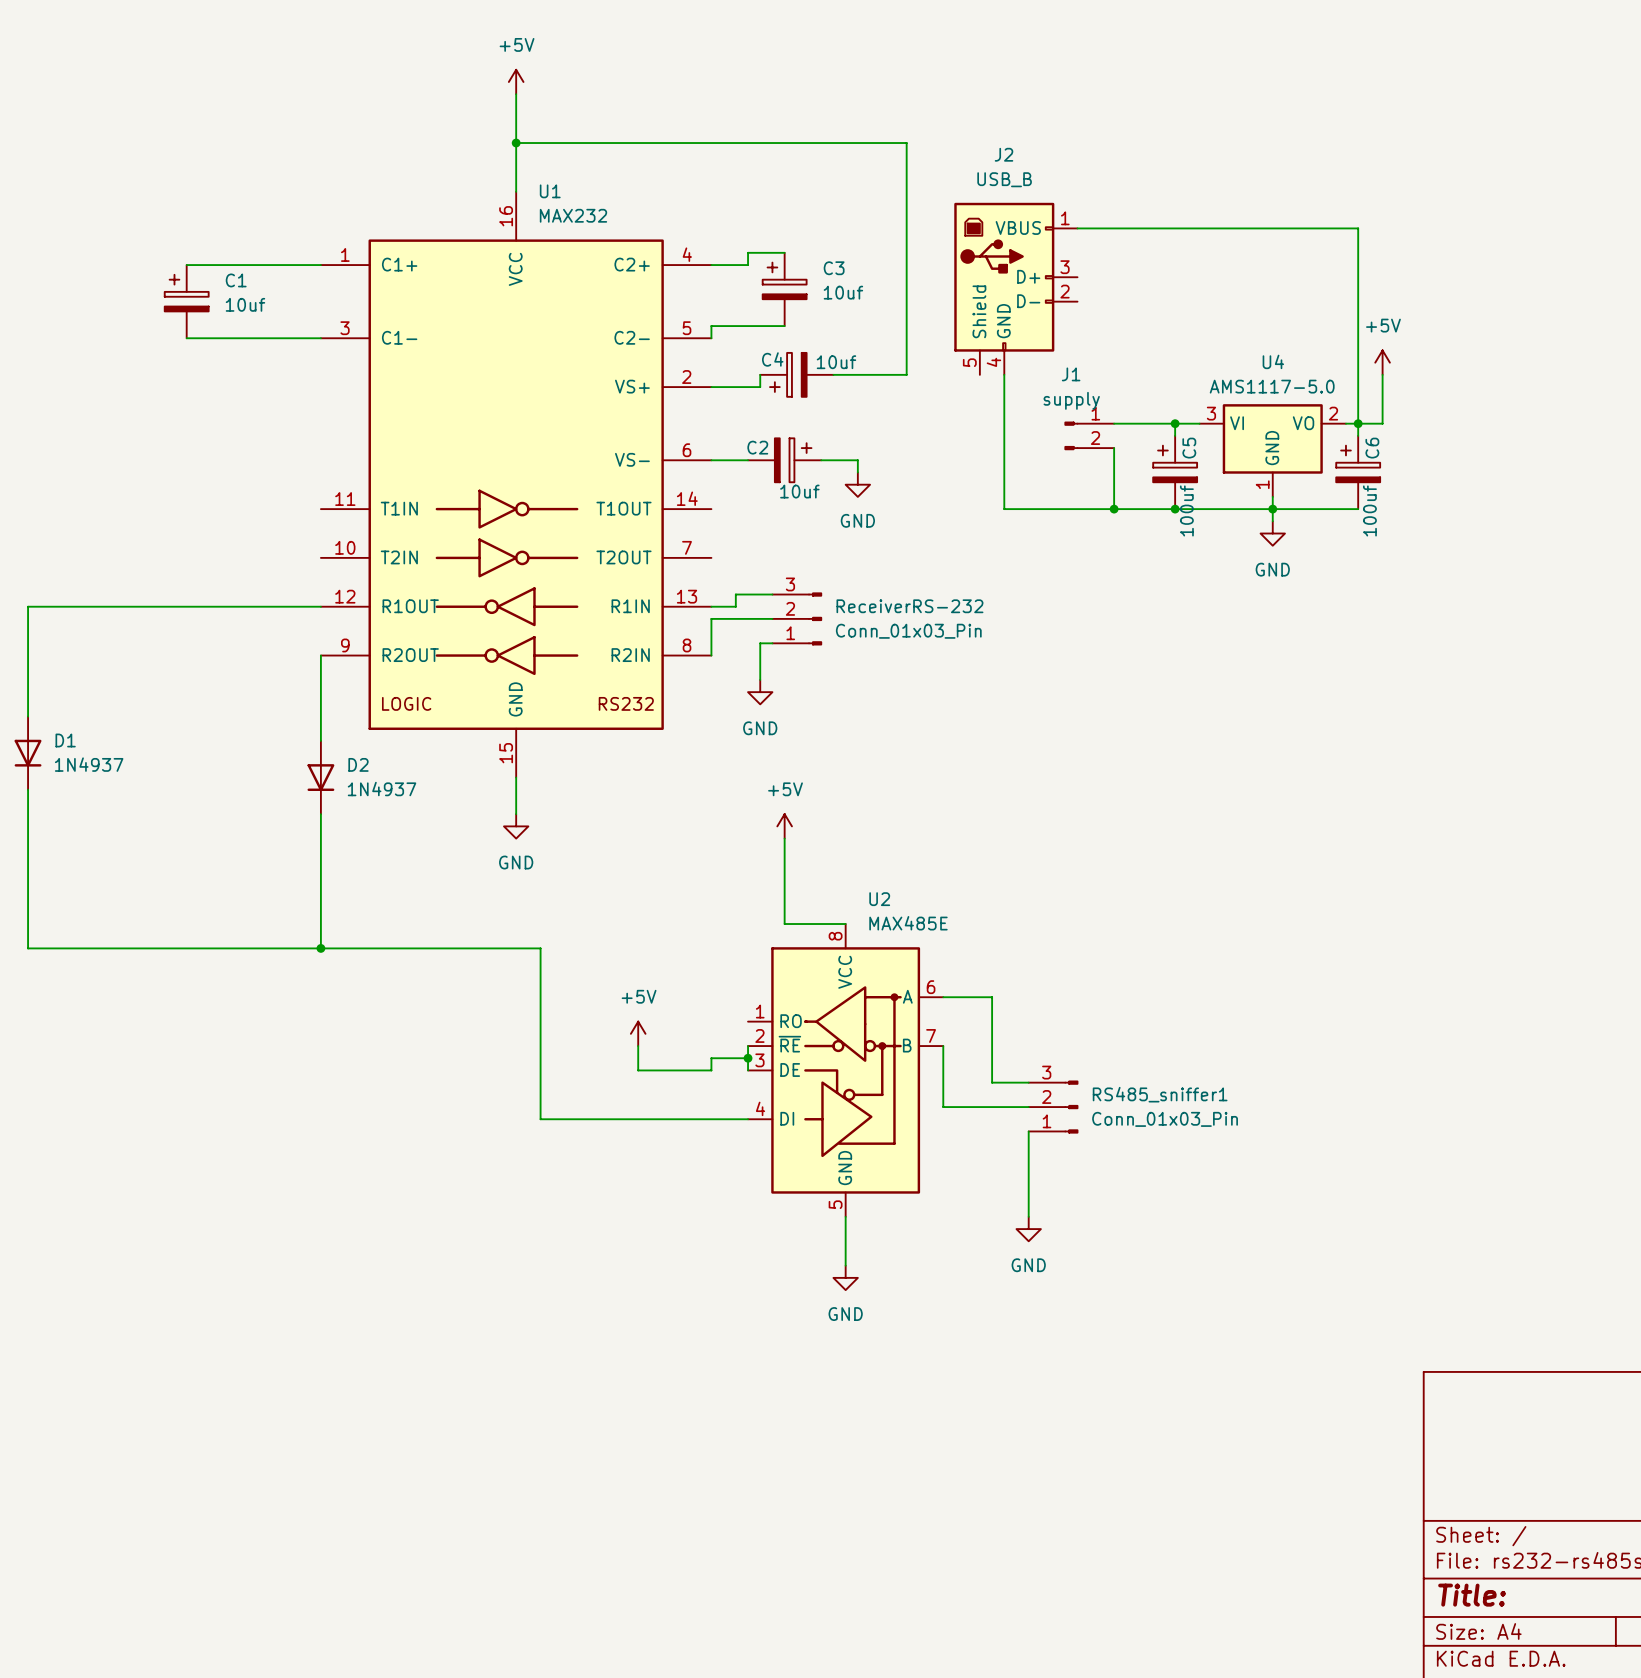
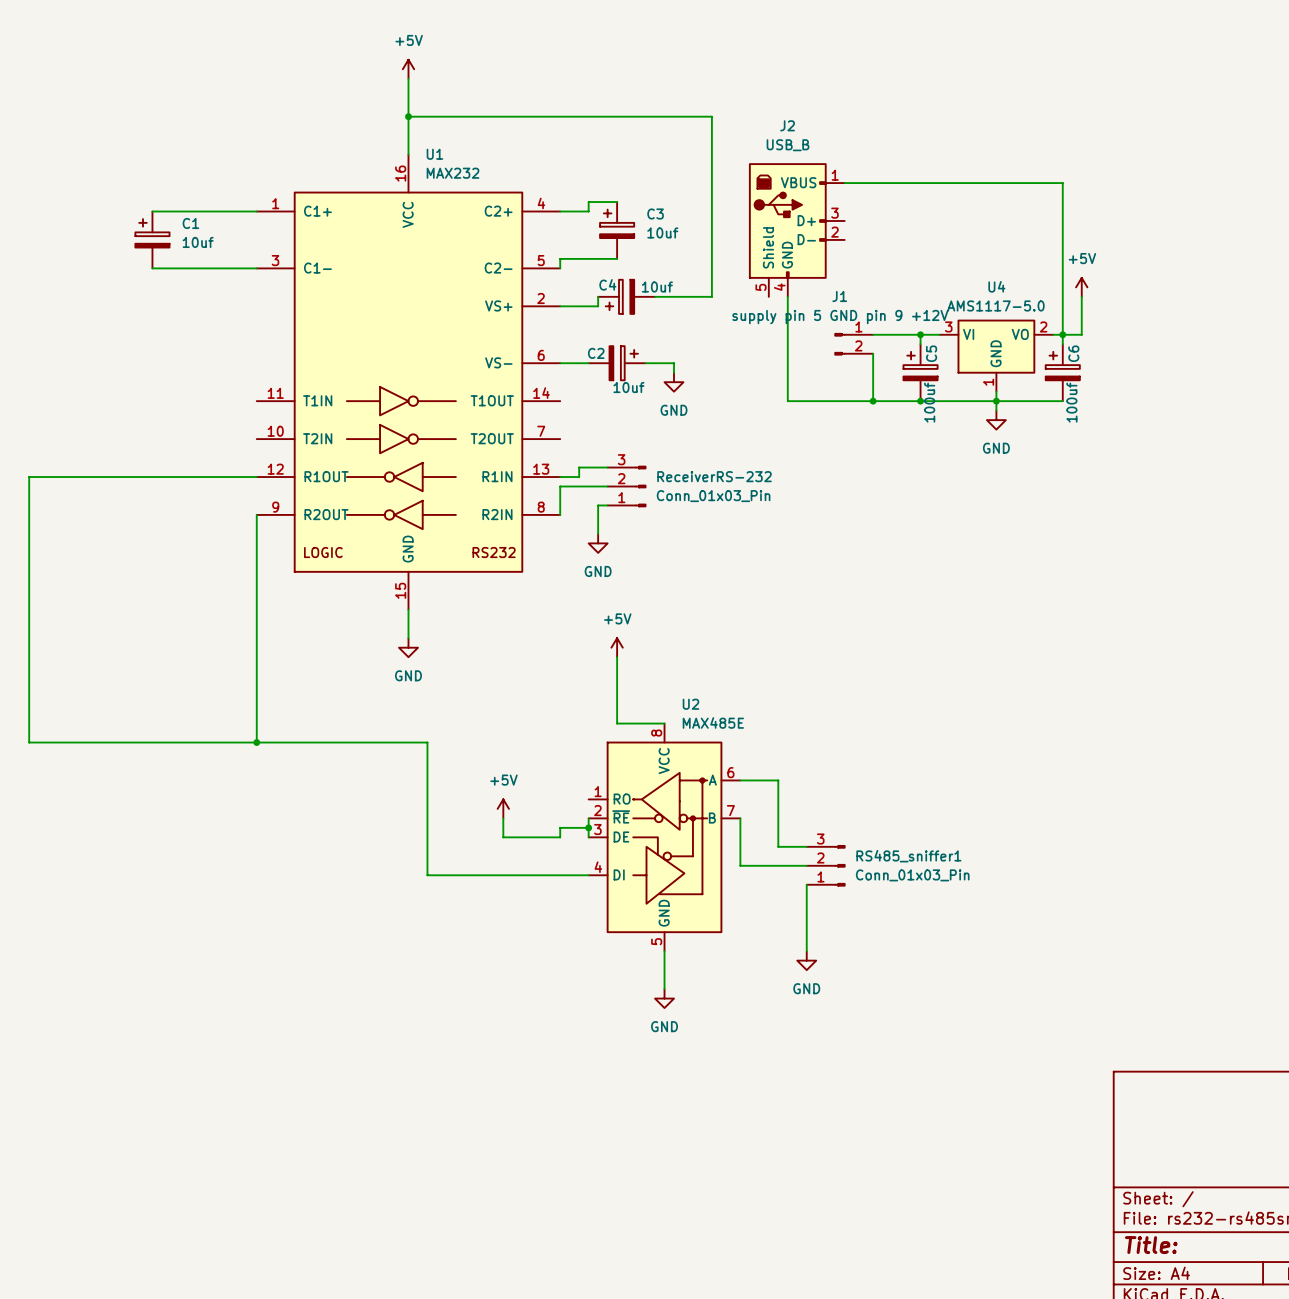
J1 value: supply (1071, 400) -> supply pin 5 GND pin 9 +12V (840, 317)
D1: 1N4937 (28, 753) -> none
D2: 1N4937 (320, 777) -> none

